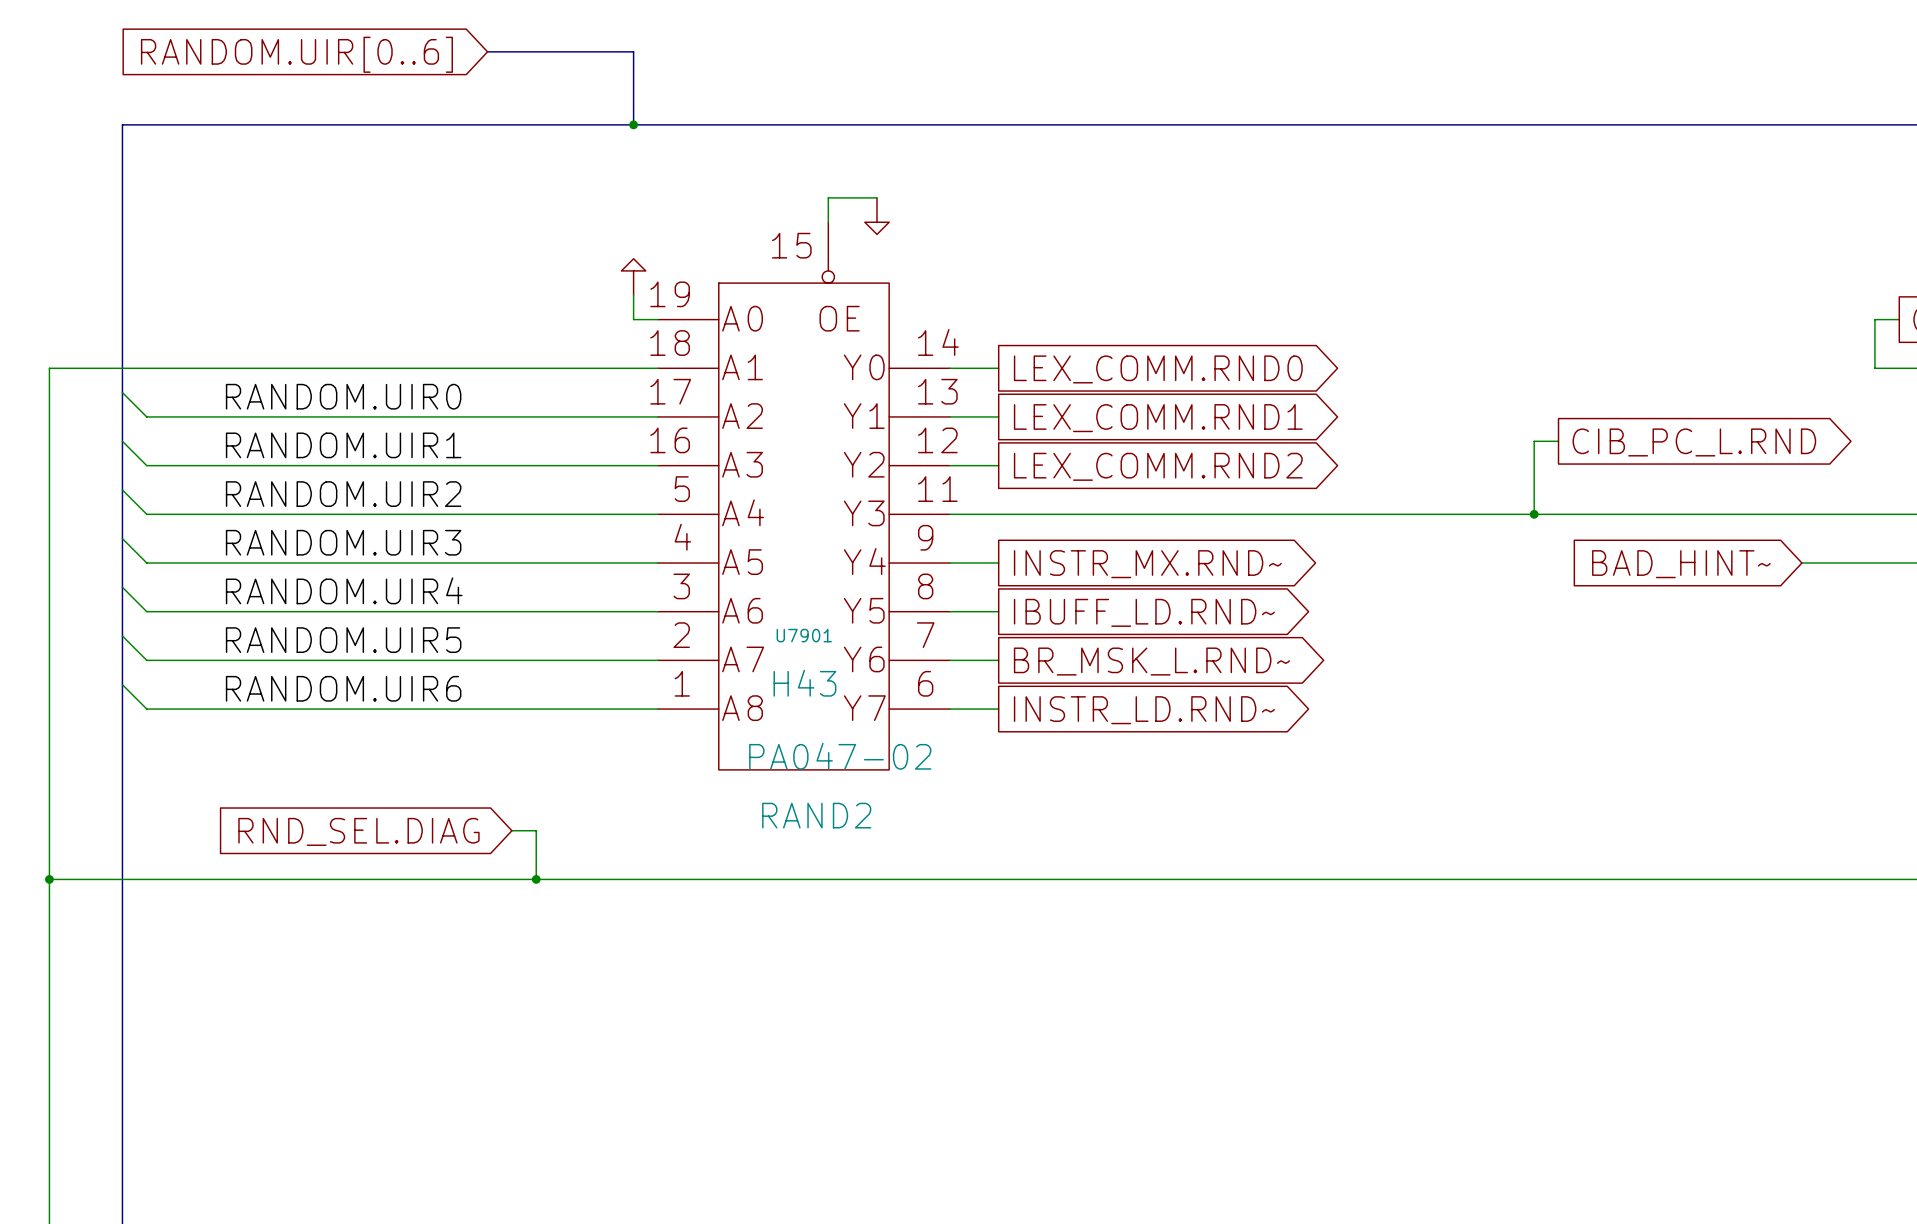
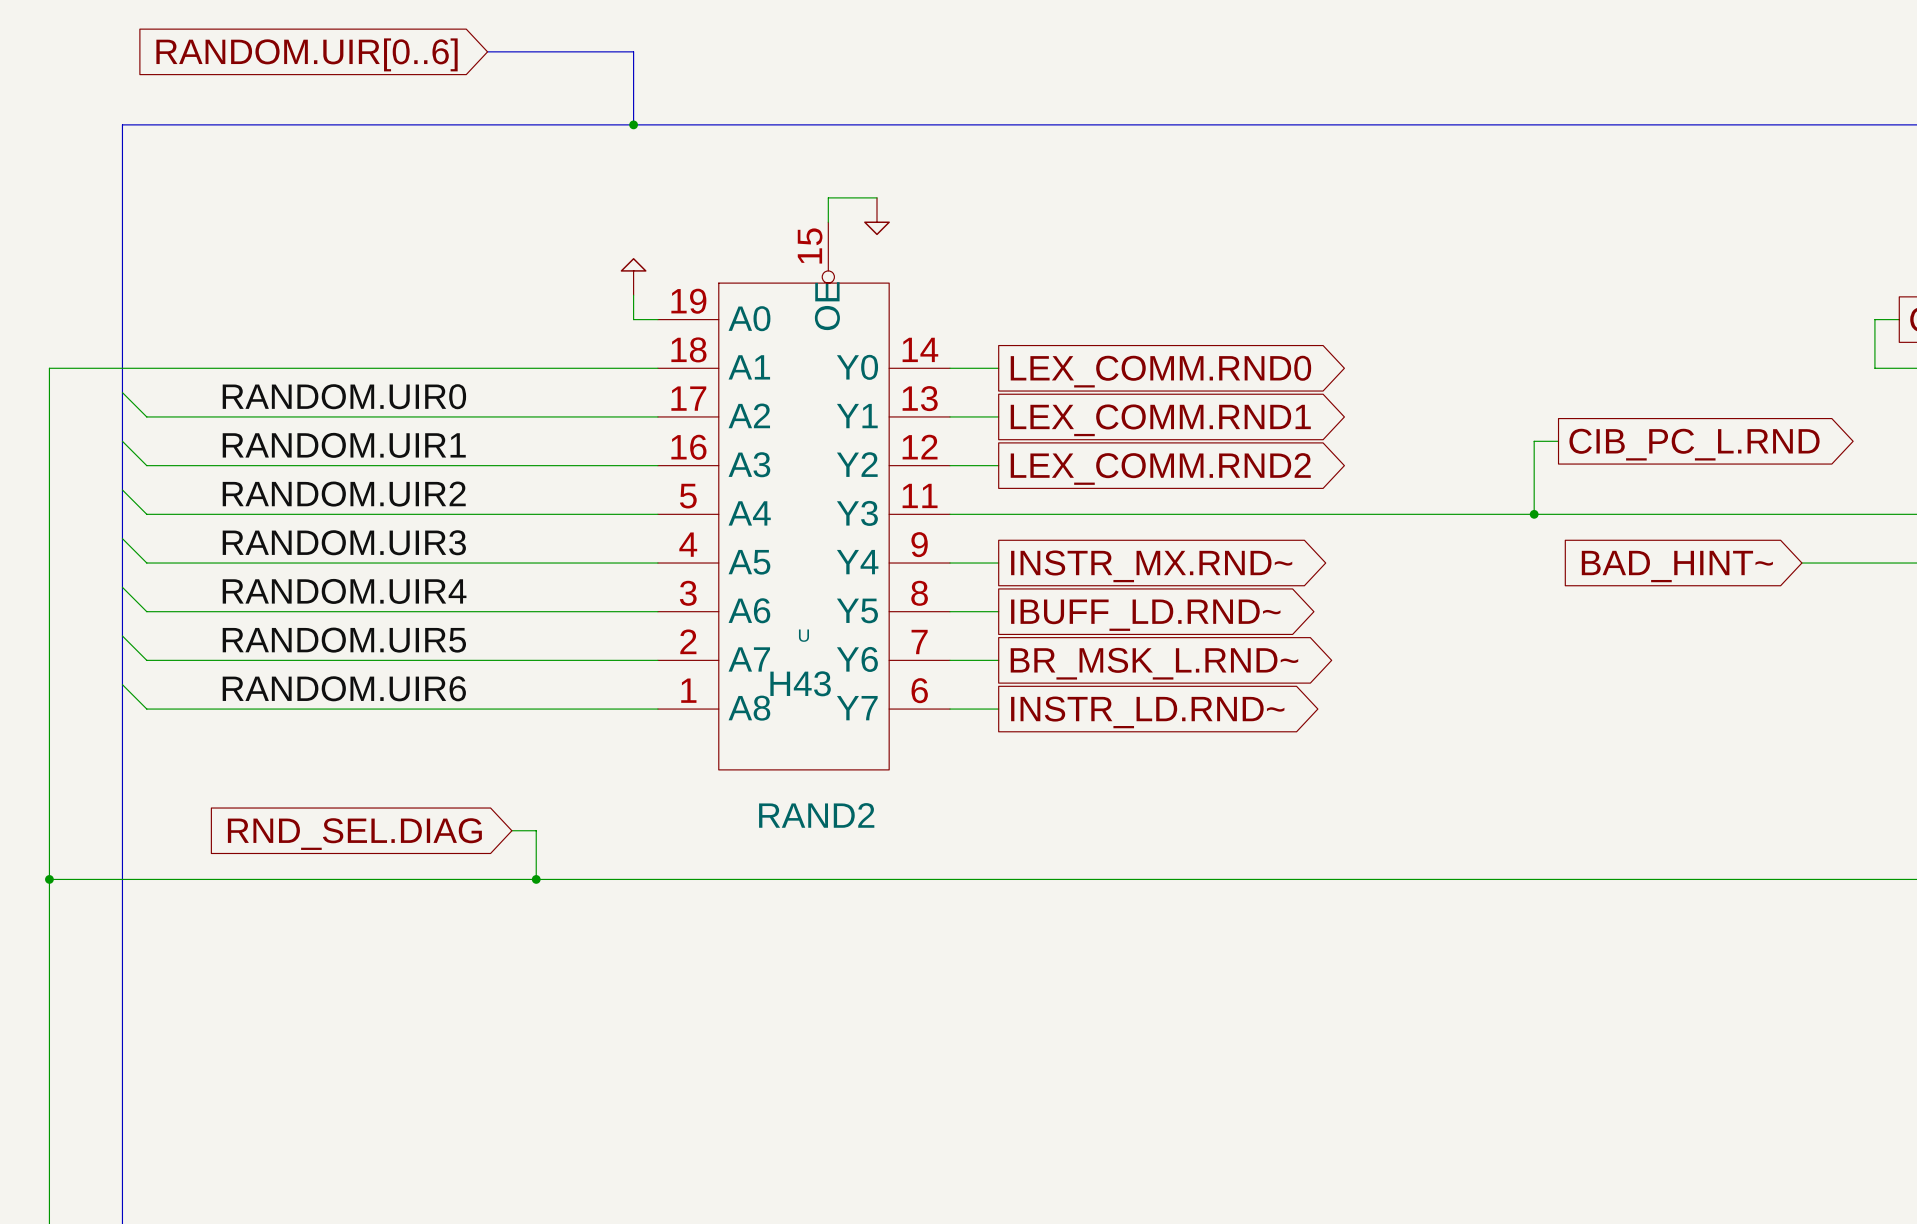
U7901 symbol: [657, 222, 951, 770] -> [657, 222, 951, 770]
U7901 name: U7901 (804, 635) -> U (803, 635)
U7901 value: PA047-02 (840, 756) -> none

